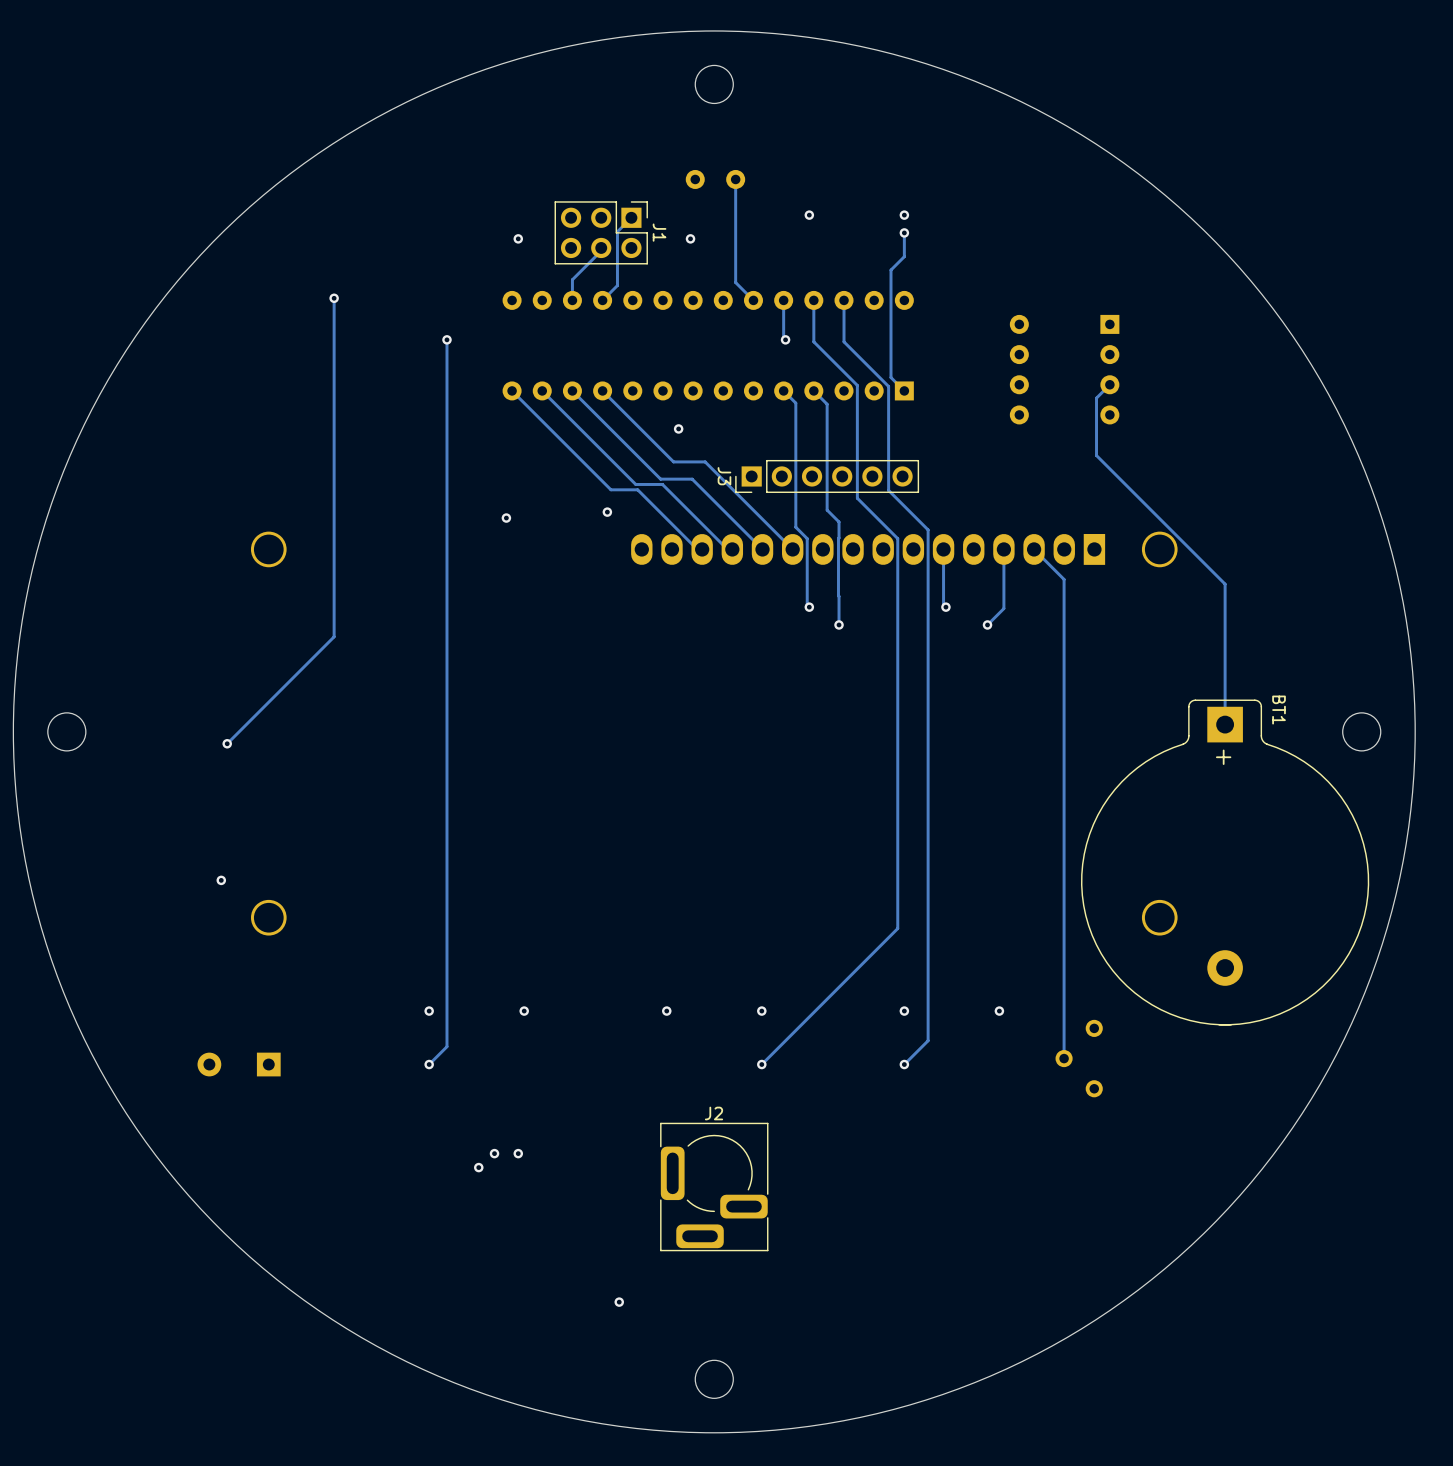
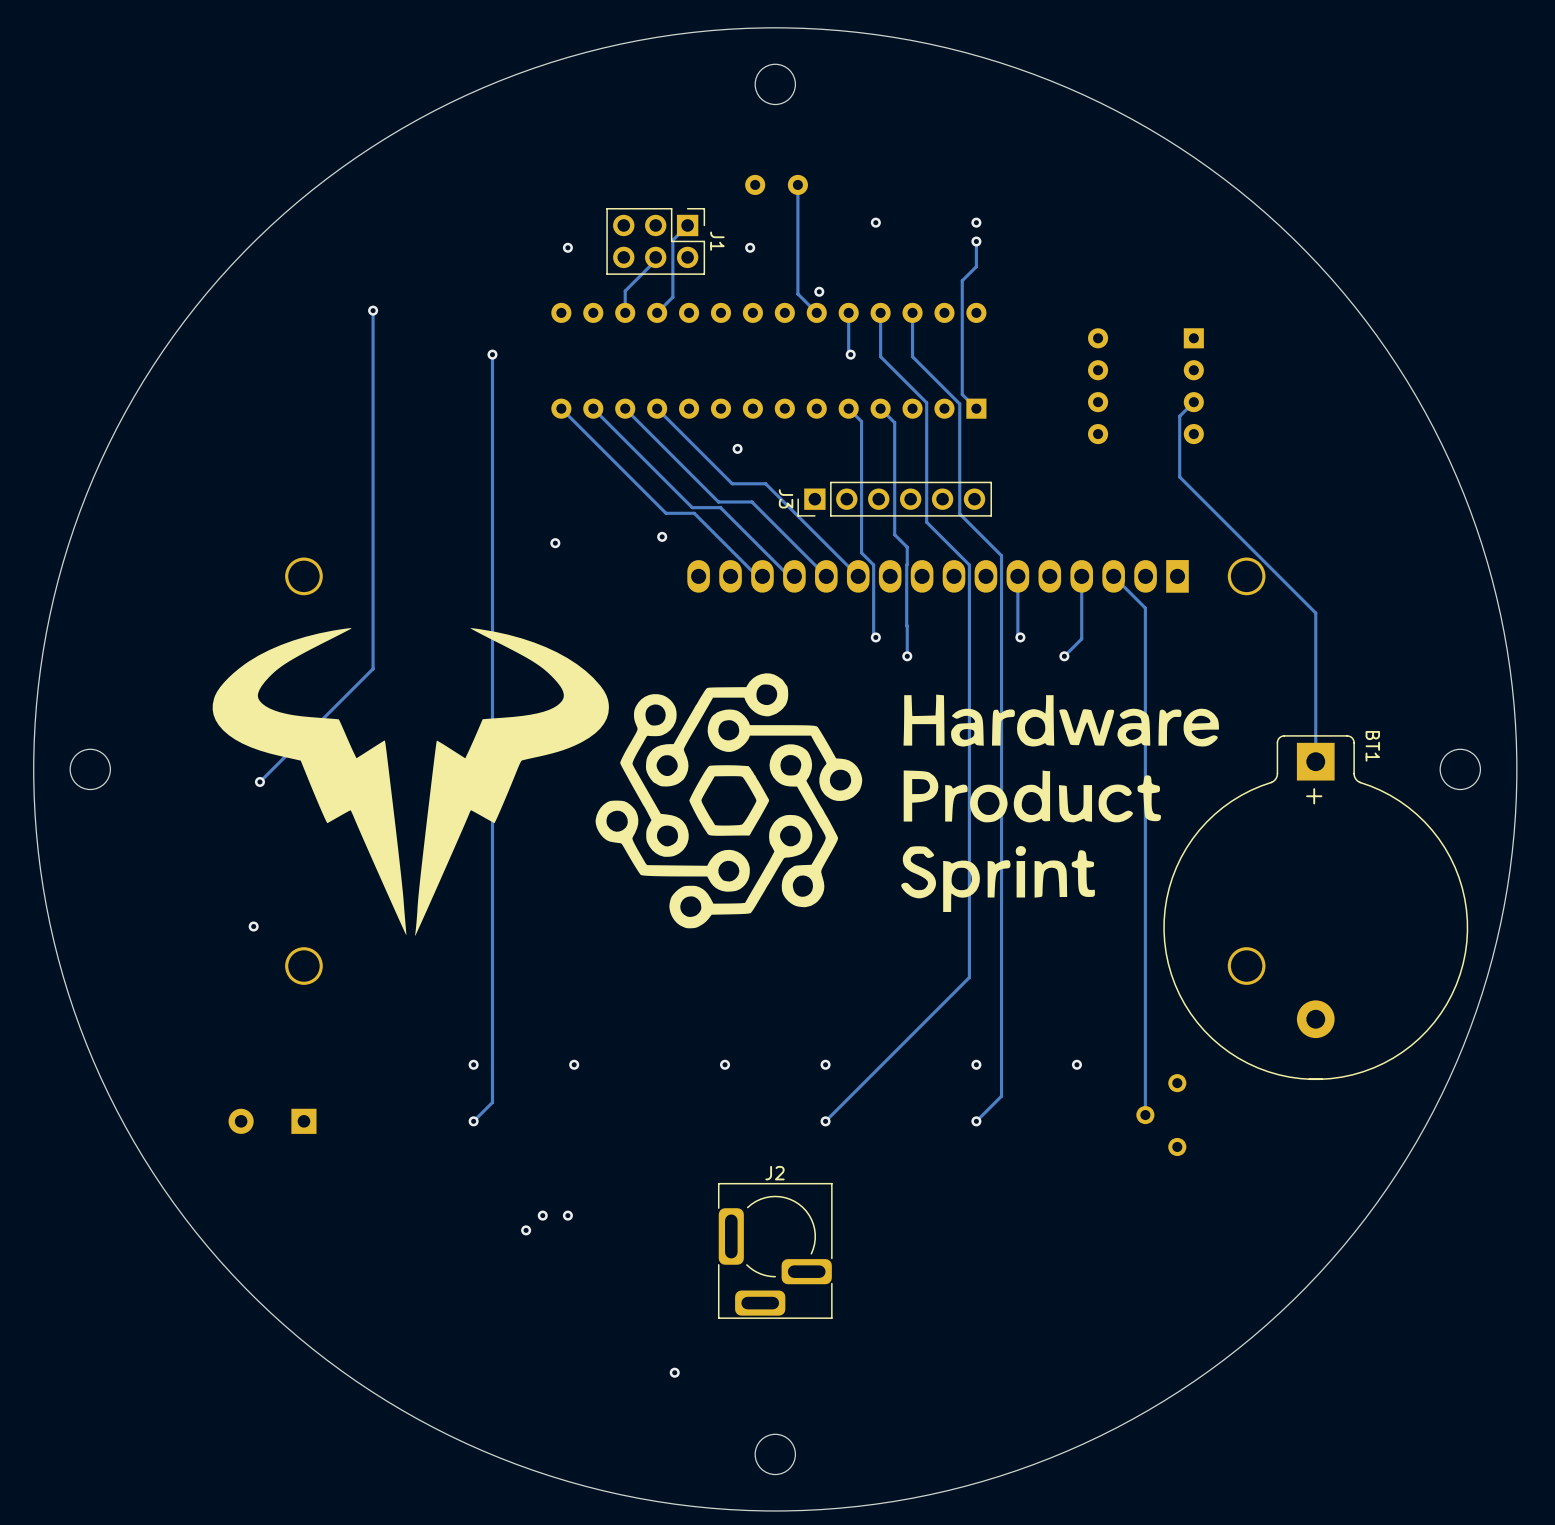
via: none -> (819, 291)
drawing: none -> [212, 628, 1219, 936]

